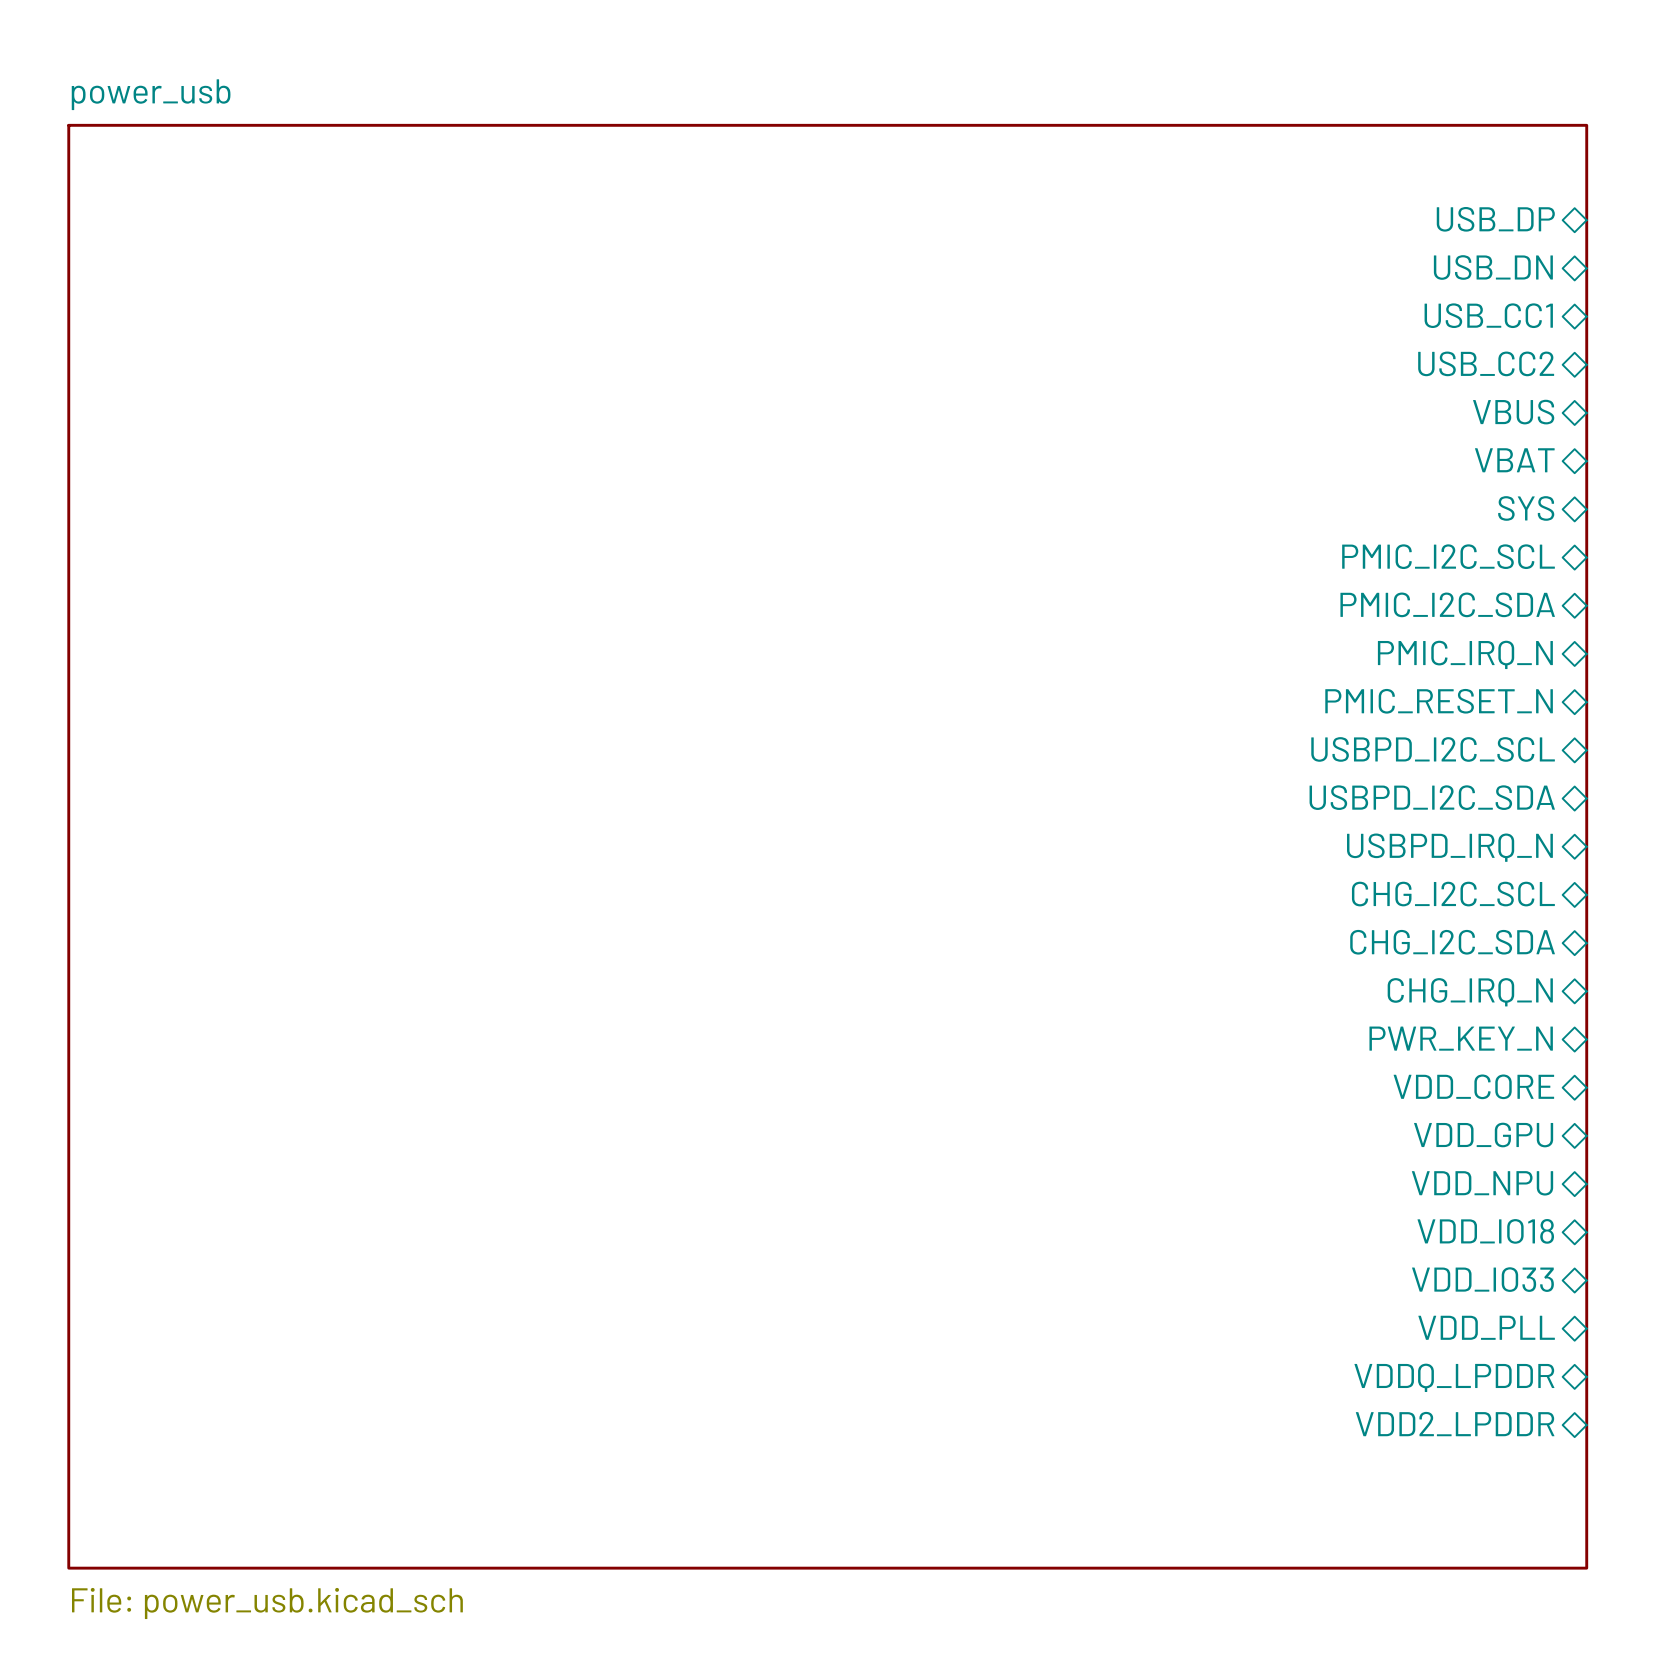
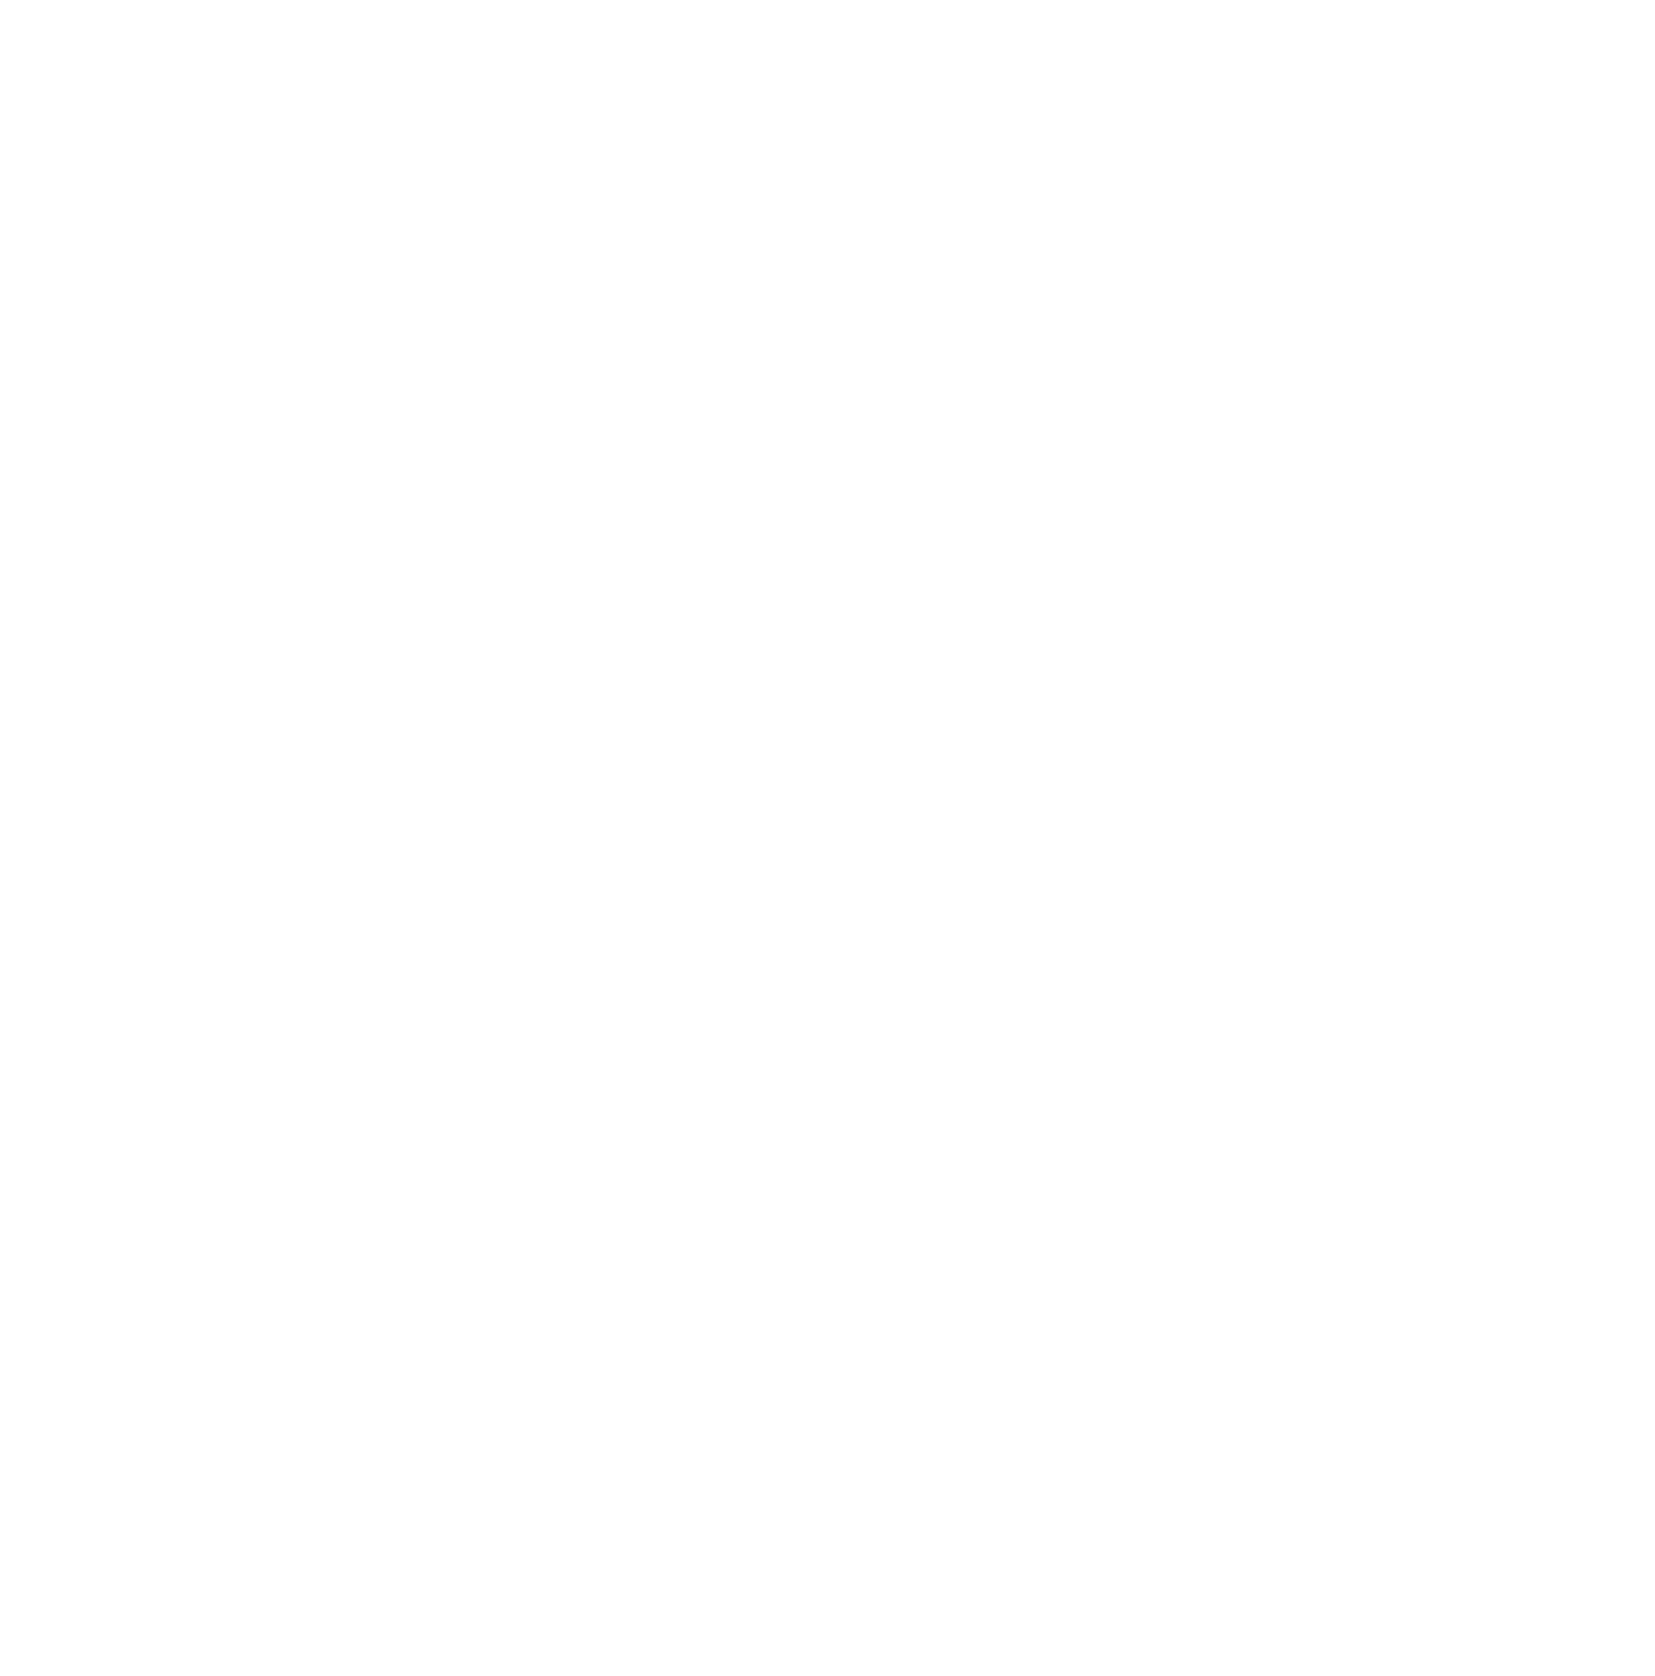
sheet pin: USB_DP (1495, 219) -> none
sheet pin: USB_DN (1493, 267) -> none
sheet pin: USB_CC1 (1488, 315) -> none
sheet pin: USB_CC2 (1486, 363) -> none
sheet pin: VBUS (1513, 412) -> none
sheet pin: VBAT (1514, 460) -> none
sheet pin: SYS (1526, 508) -> none
sheet pin: PMIC_I2C_SCL (1448, 556) -> none
sheet pin: PMIC_I2C_SDA (1447, 604) -> none
sheet pin: PMIC_IRQ_N (1465, 654) -> none
sheet pin: PMIC_RESET_N (1439, 701) -> none
sheet pin: USBPD_I2C_SCL (1433, 749) -> none
sheet pin: USBPD_I2C_SDA (1432, 797) -> none
sheet power_usb: File: power_usb.kicad_sch (827, 846) -> none
sheet pin: USBPD_IRQ_N (1449, 847) -> none
sheet pin: CHG_I2C_SCL (1453, 894) -> none
sheet pin: CHG_I2C_SDA (1452, 942) -> none
sheet pin: CHG_IRQ_N (1470, 992) -> none
sheet pin: PWR_KEY_N (1461, 1038) -> none
sheet pin: VDD_CORE (1473, 1086) -> none
sheet pin: VDD_GPU (1483, 1135) -> none
sheet pin: VDD_NPU (1482, 1183) -> none
sheet pin: VDD_IO18 (1485, 1231) -> none
sheet pin: VDD_IO33 (1482, 1279) -> none
sheet pin: VDD_PLL (1486, 1327) -> none
sheet pin: VDDQ_LPDDR (1454, 1377) -> none
sheet pin: VDD2_LPDDR (1455, 1424) -> none

